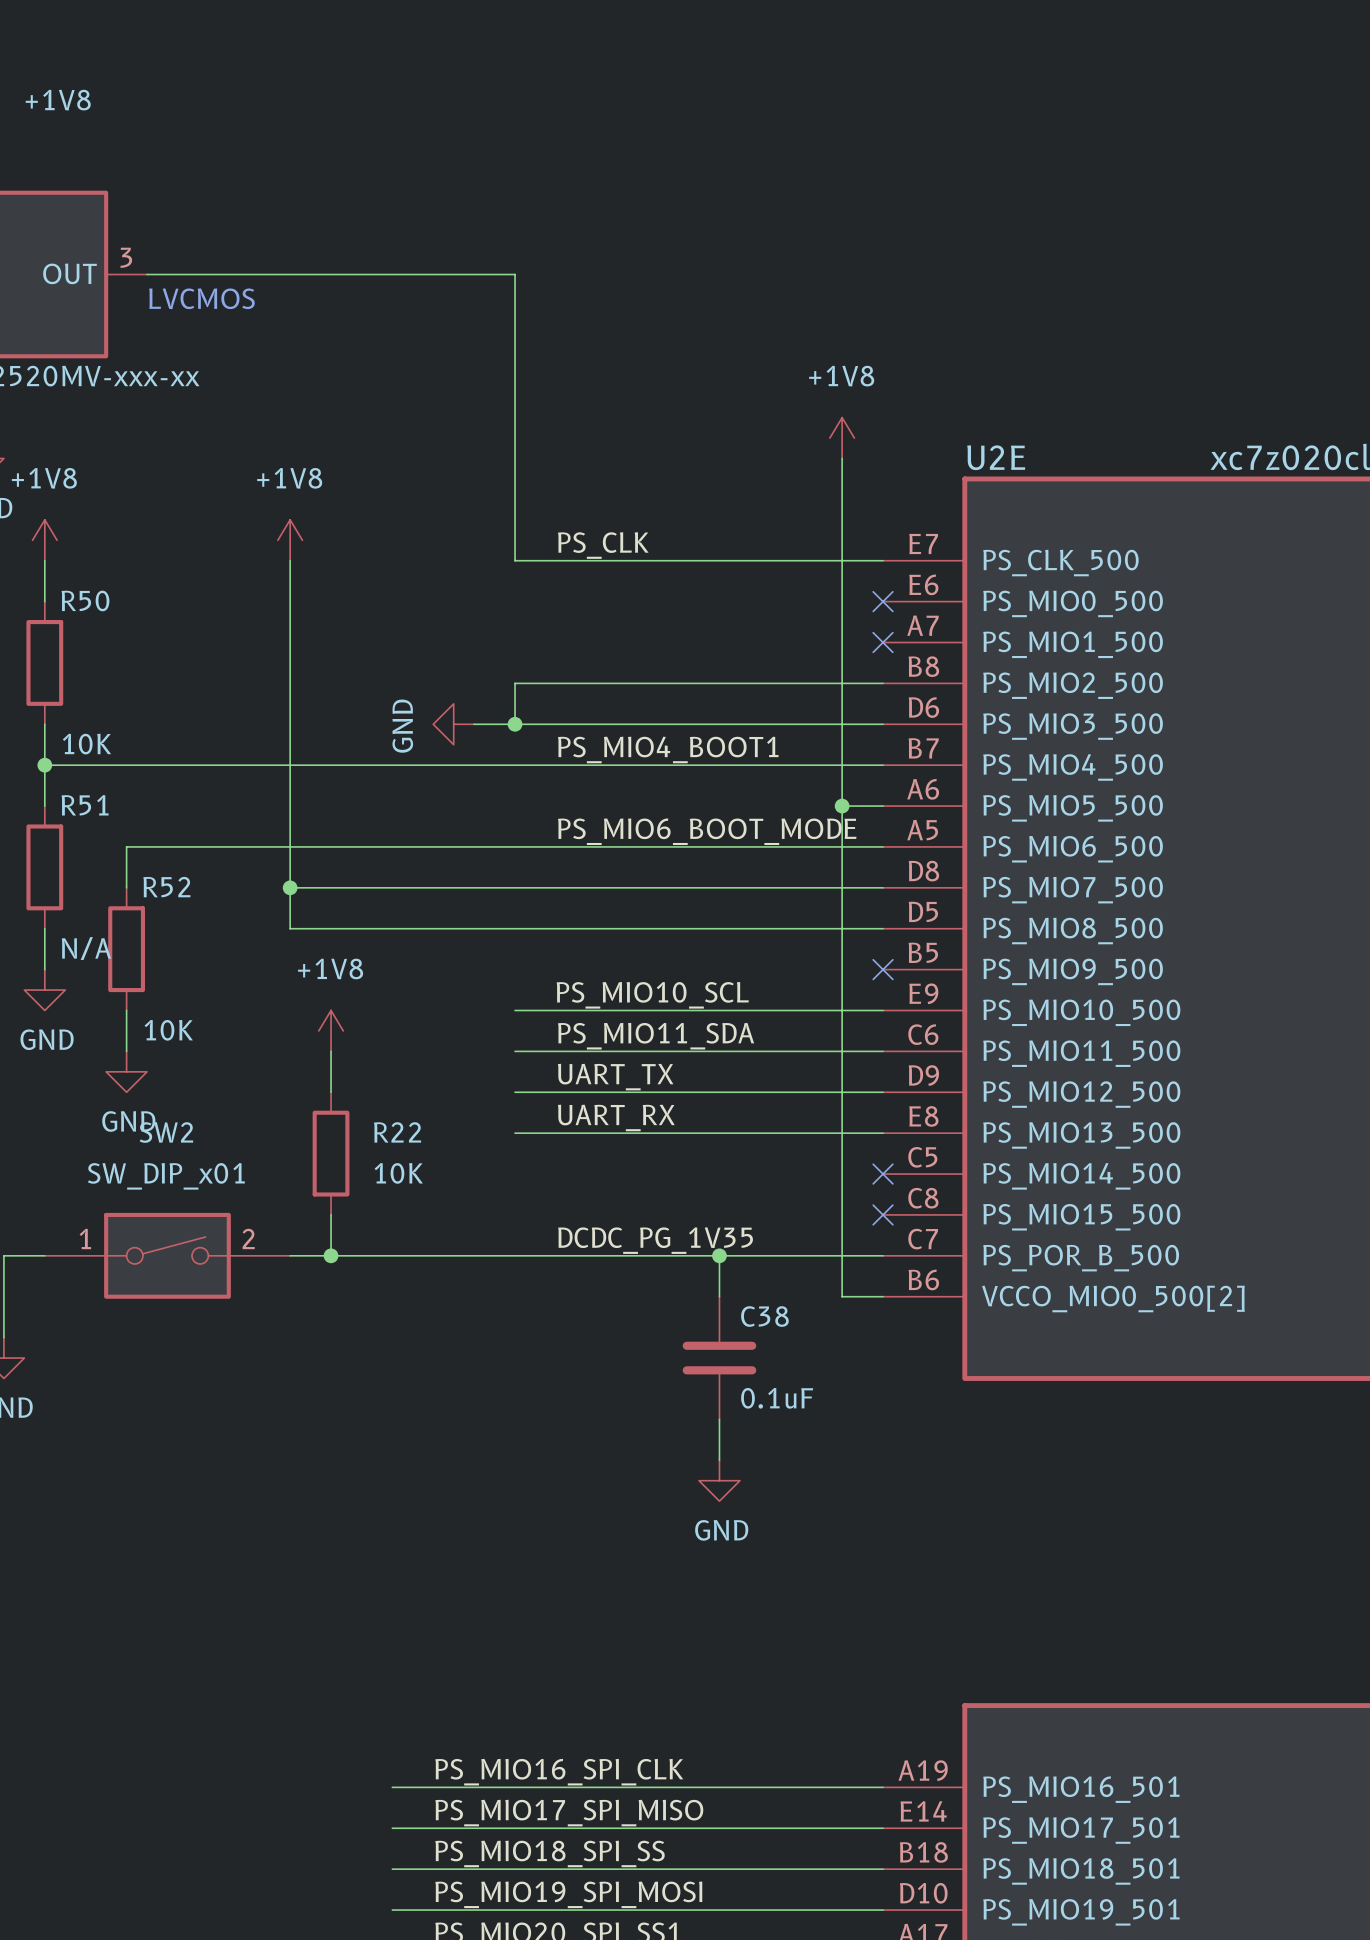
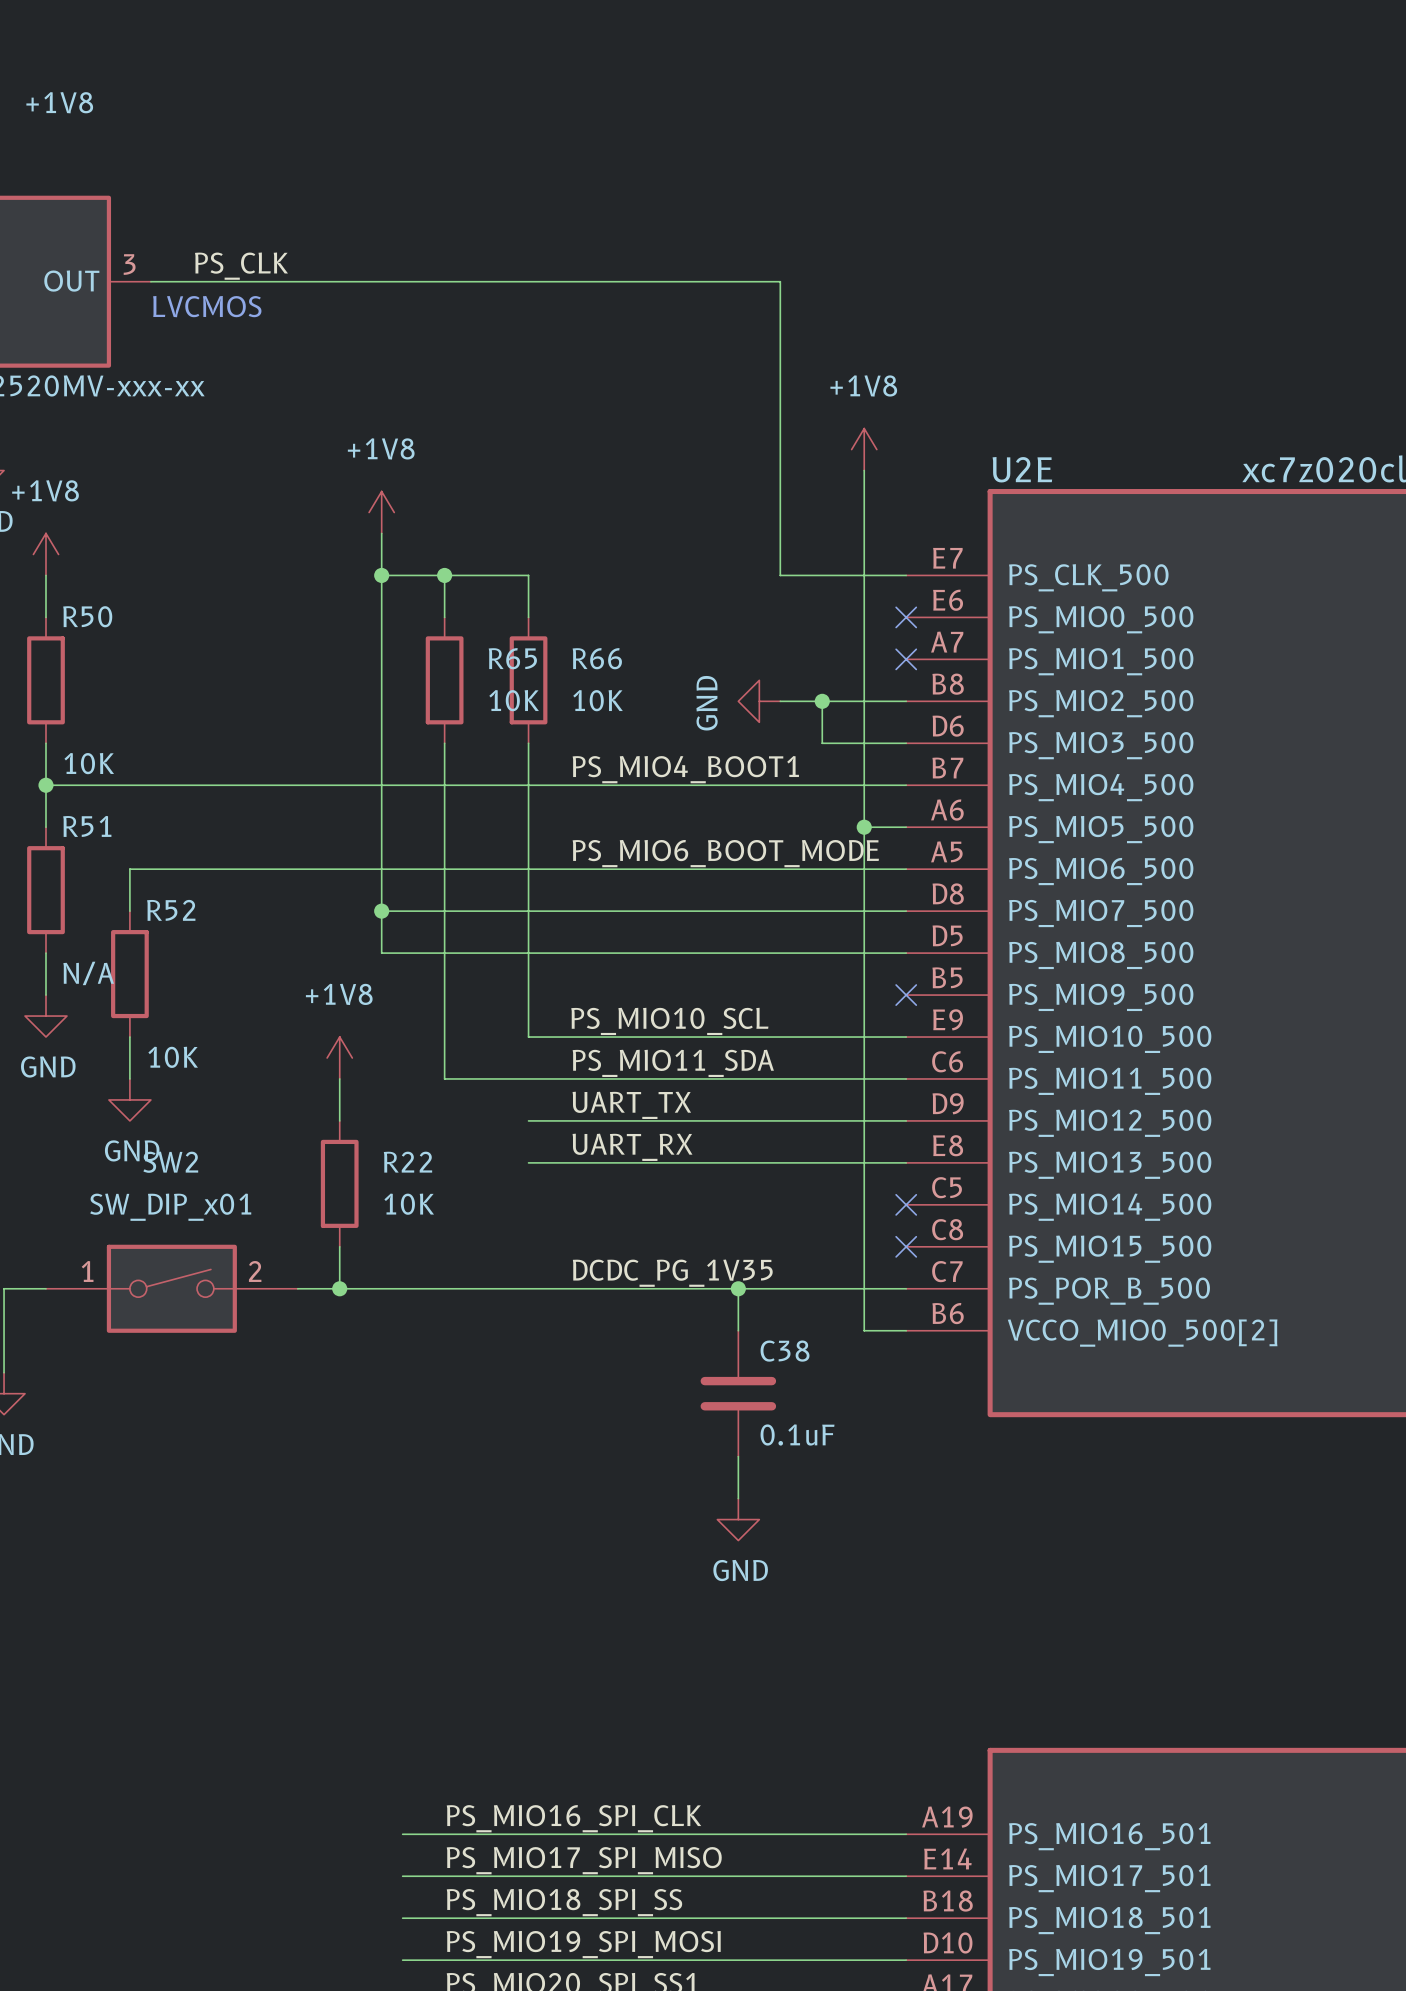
label: none -> PS_CLK (241, 266)
wire: (515, 274) (515, 560) (760, 560) -> (528, 281) (780, 281) (780, 575)
power symbol position: +1V8 (290, 540) -> +1V8 (381, 512)
label: PS_CLK (603, 545) -> none
wire: (290, 560) (290, 928) (371, 928) -> (381, 533) (381, 953)
wire: none -> (381, 575) (528, 575) (528, 617)
junction: none -> (381, 575)
wire: none -> (444, 575) (444, 617)
junction: none -> (444, 575)
R65: none -> 10K (444, 680)
R66: none -> 10K (528, 680)
wire: (760, 683) (515, 683) (515, 724) -> (528, 1037) (528, 743)
junction: none -> (822, 701)
wire: none -> (444, 743) (444, 1078) (528, 1078)
power symbol position: GND (453, 724) -> GND (759, 701)
wire: (474, 724) (801, 724) -> (822, 701) (822, 743)
junction: (515, 724) -> none
wire: (290, 887) (371, 887) -> none
junction position: (290, 887) -> (381, 911)

